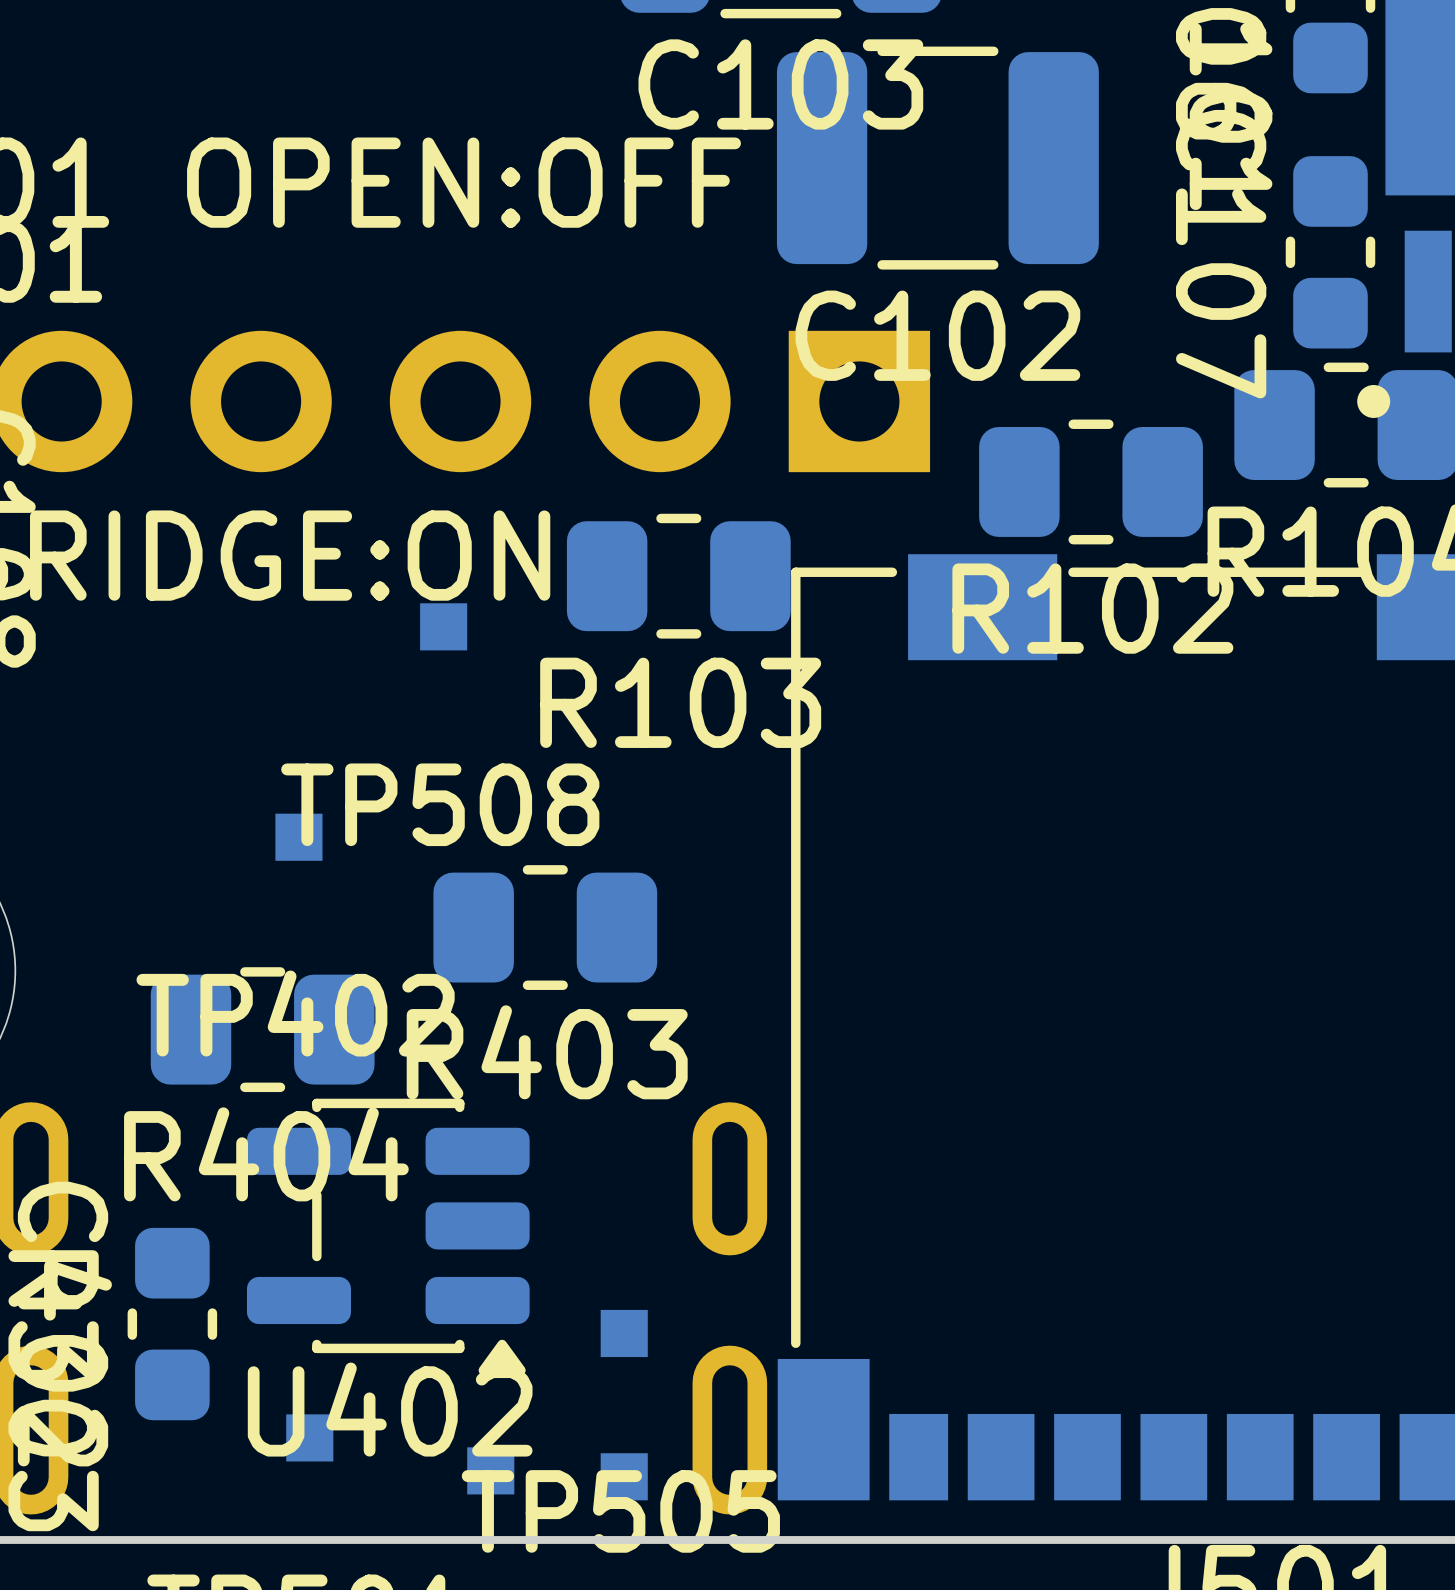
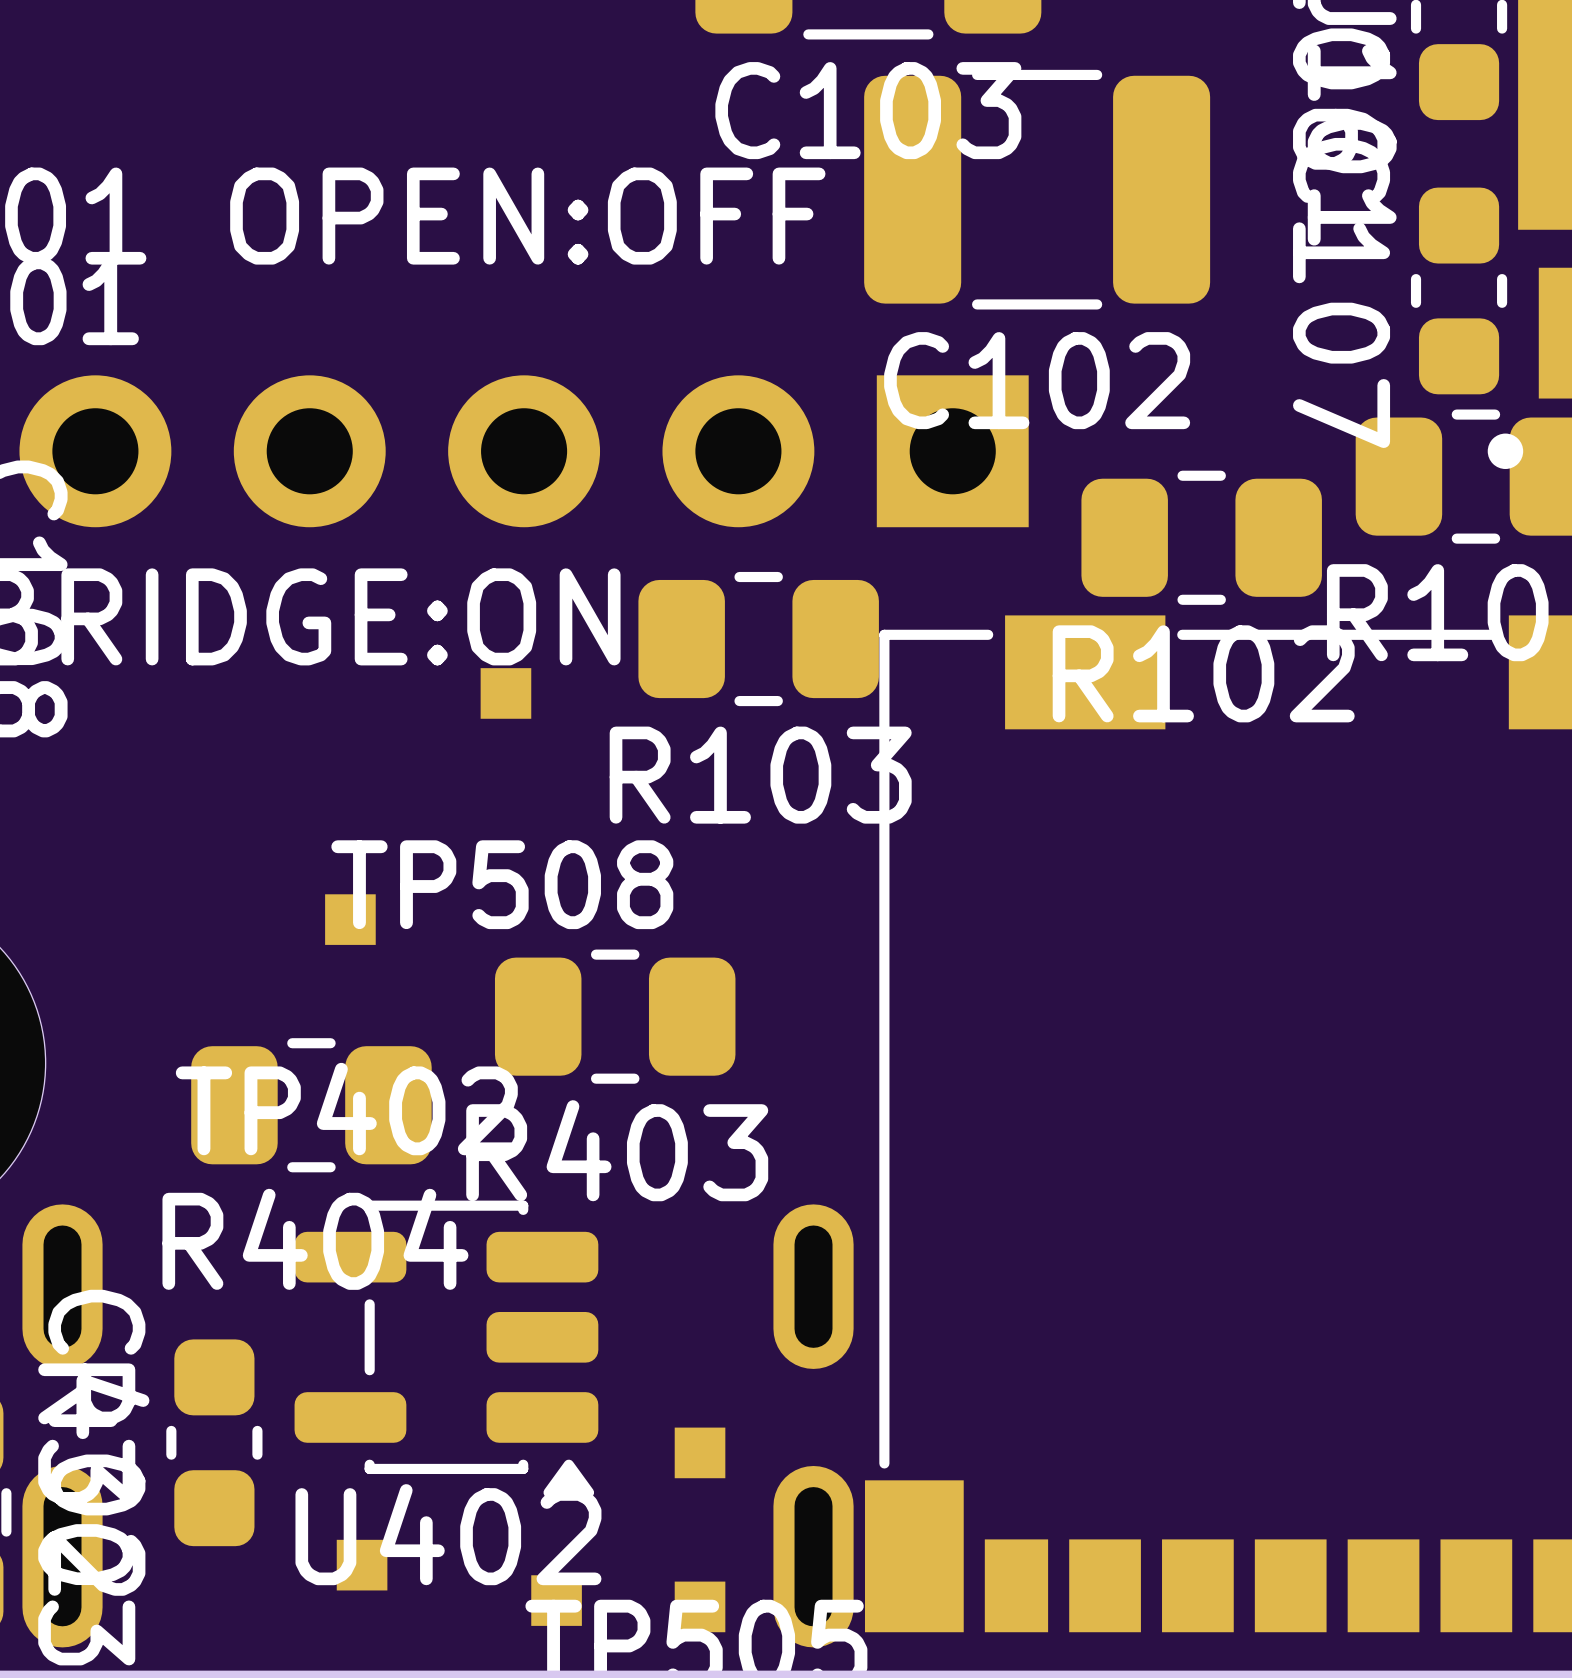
R404 position: (262, 1029) -> (311, 1105)

